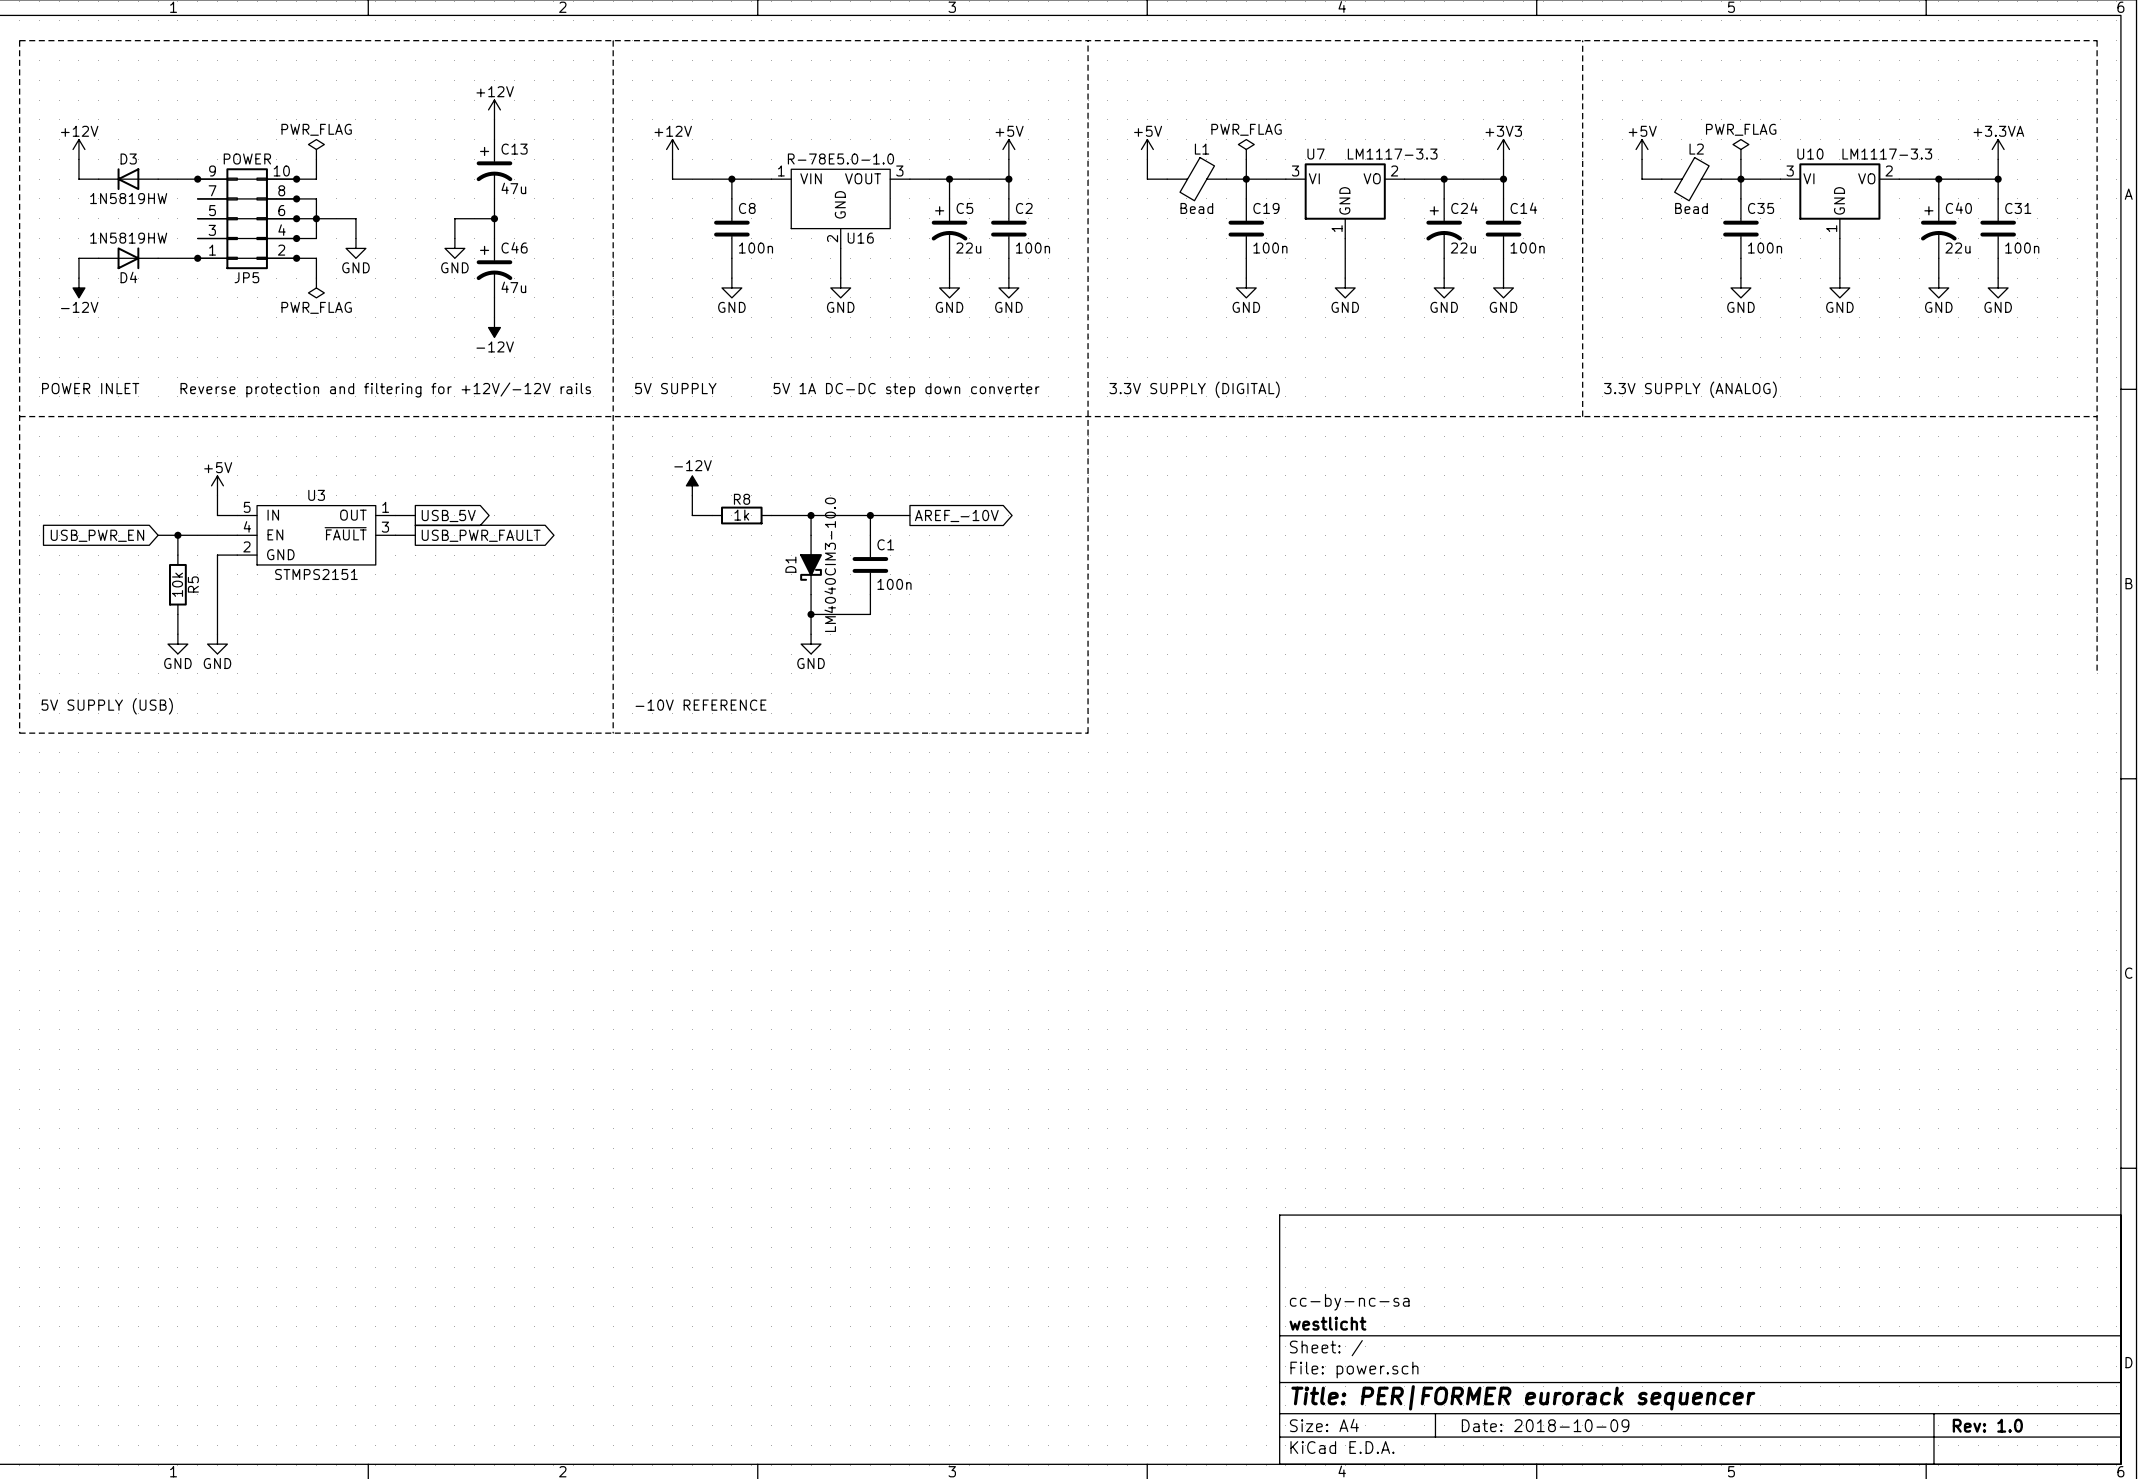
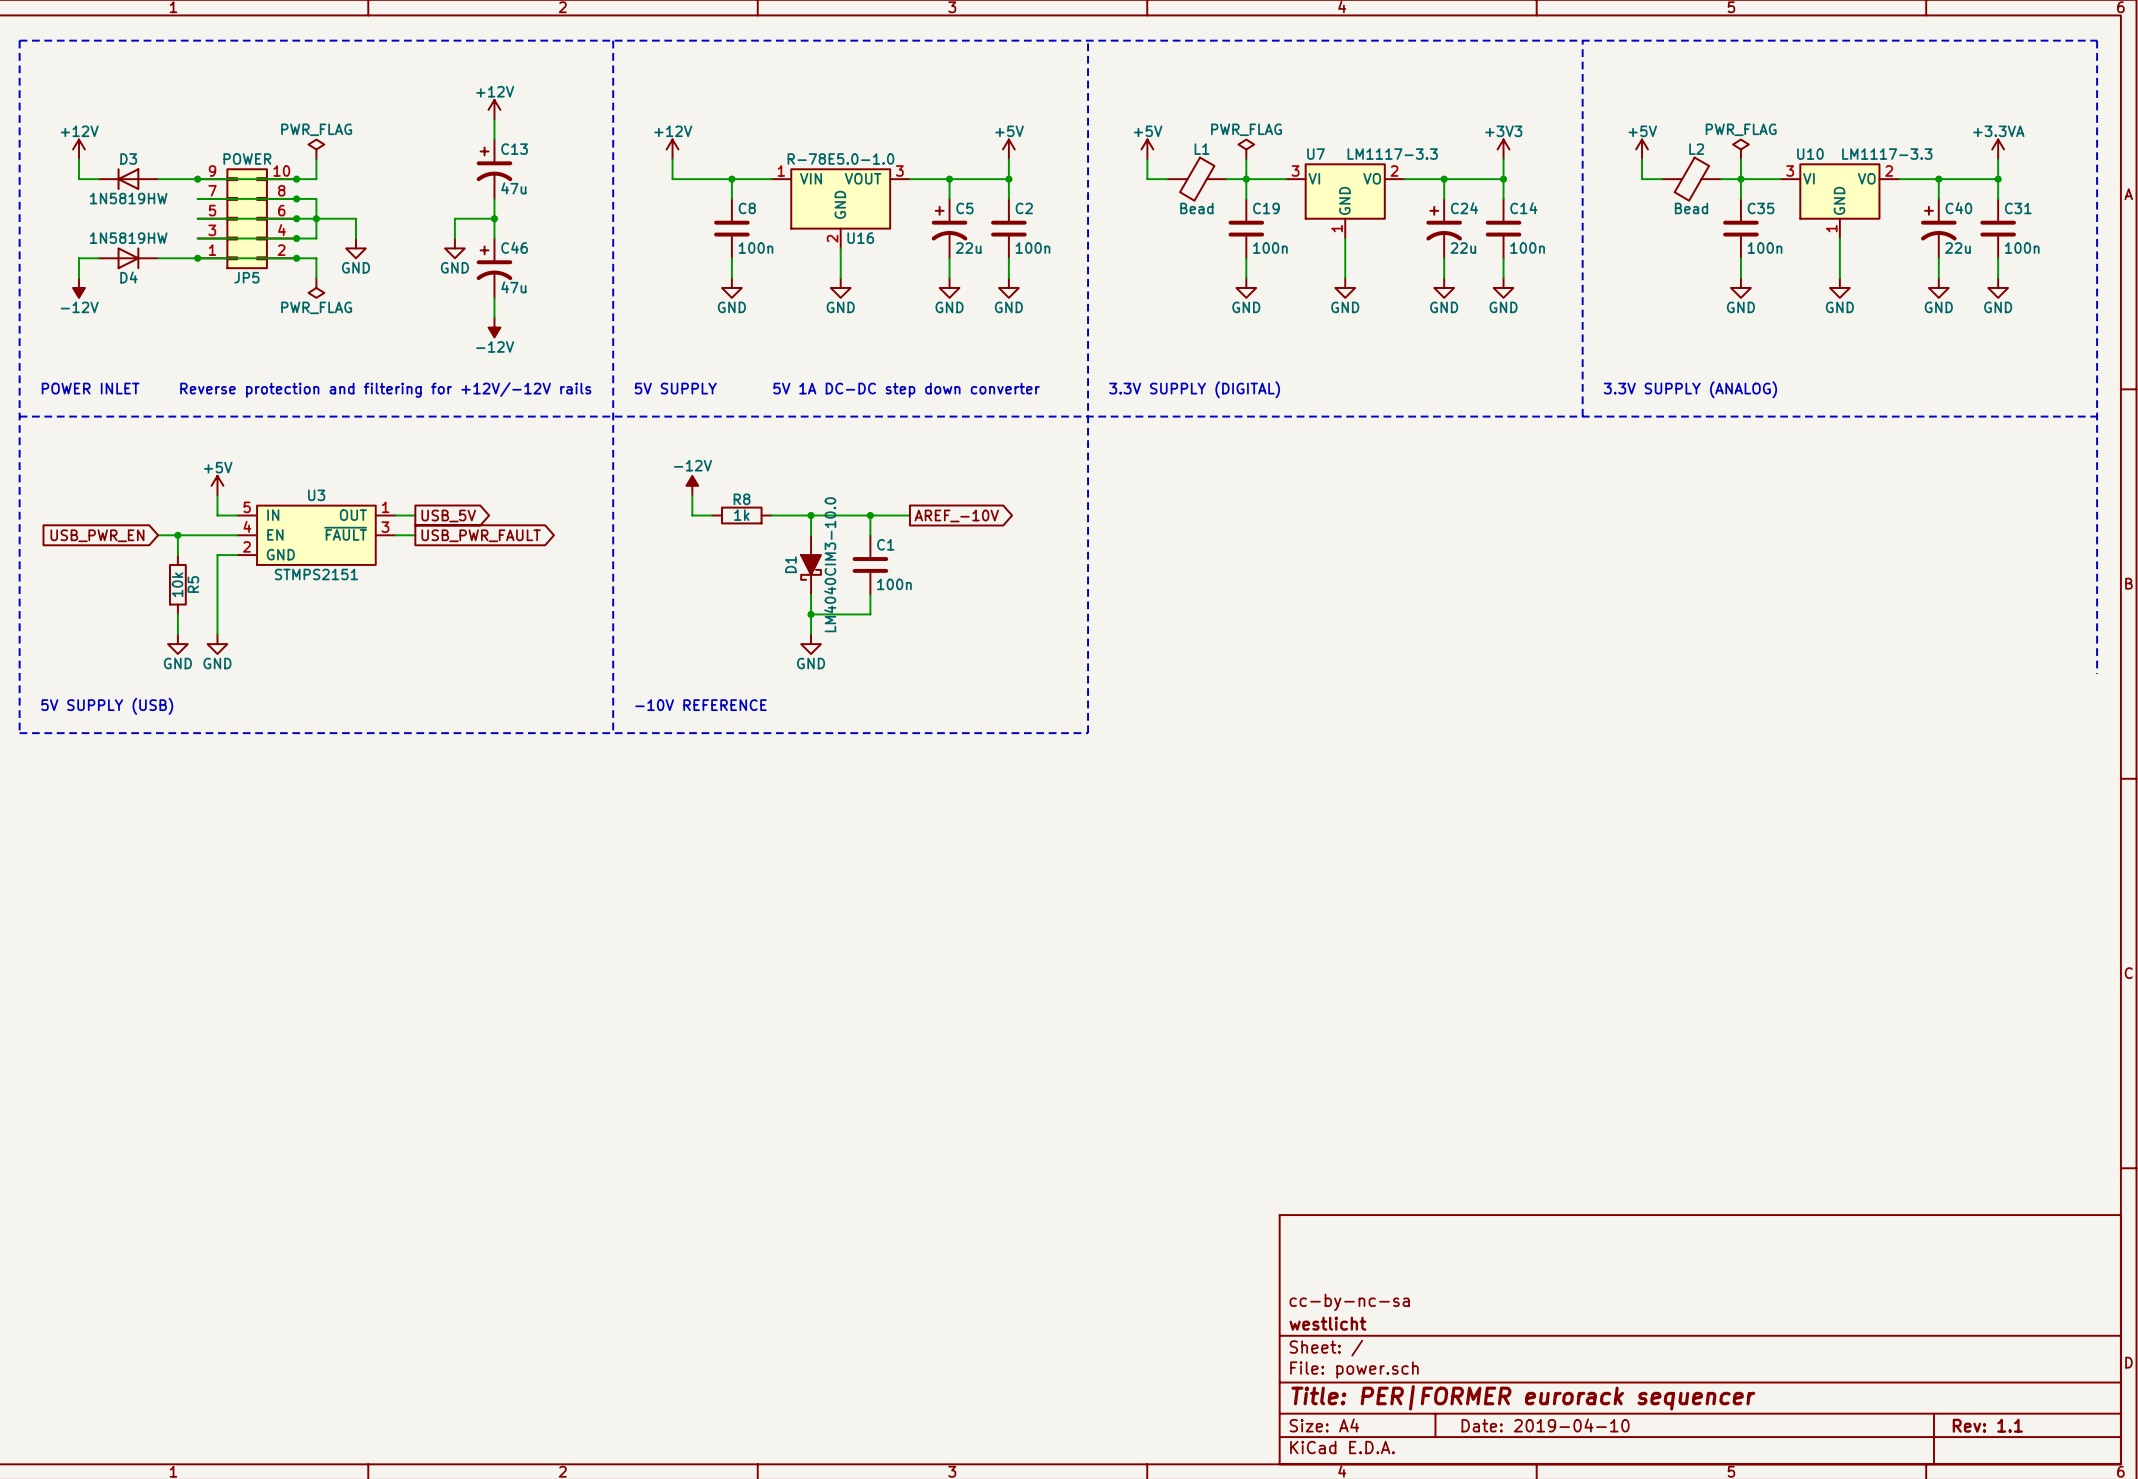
title block: Date: 2018-10-09 (1545, 1425) -> Date: 2019-04-10 (1545, 1425)
title block: Rev: 1.0 (1987, 1425) -> Rev: 1.1 (1987, 1425)

